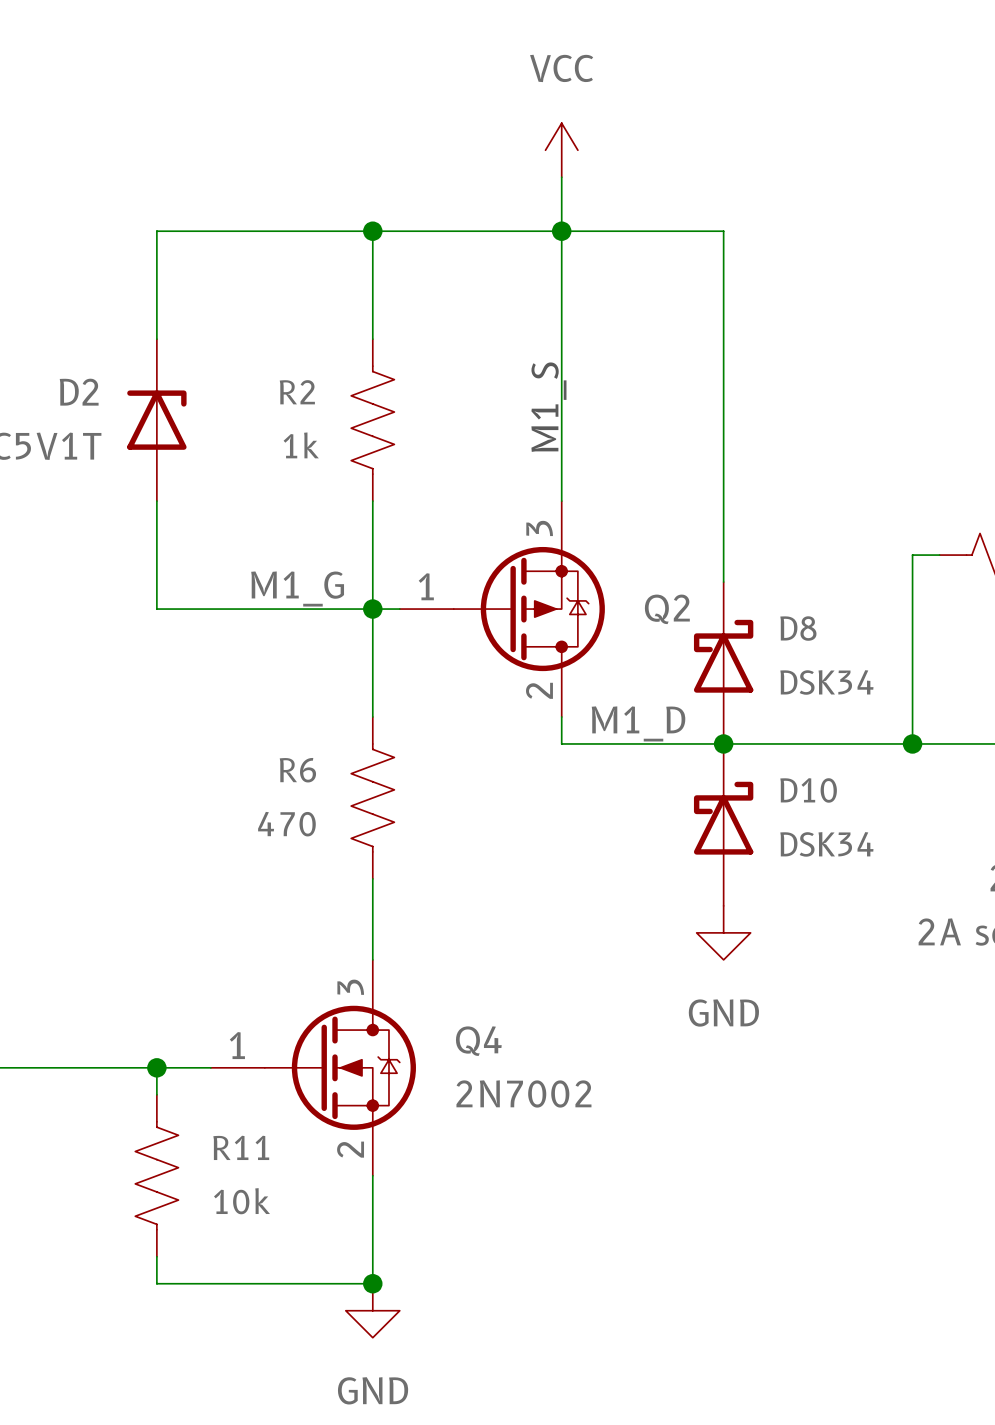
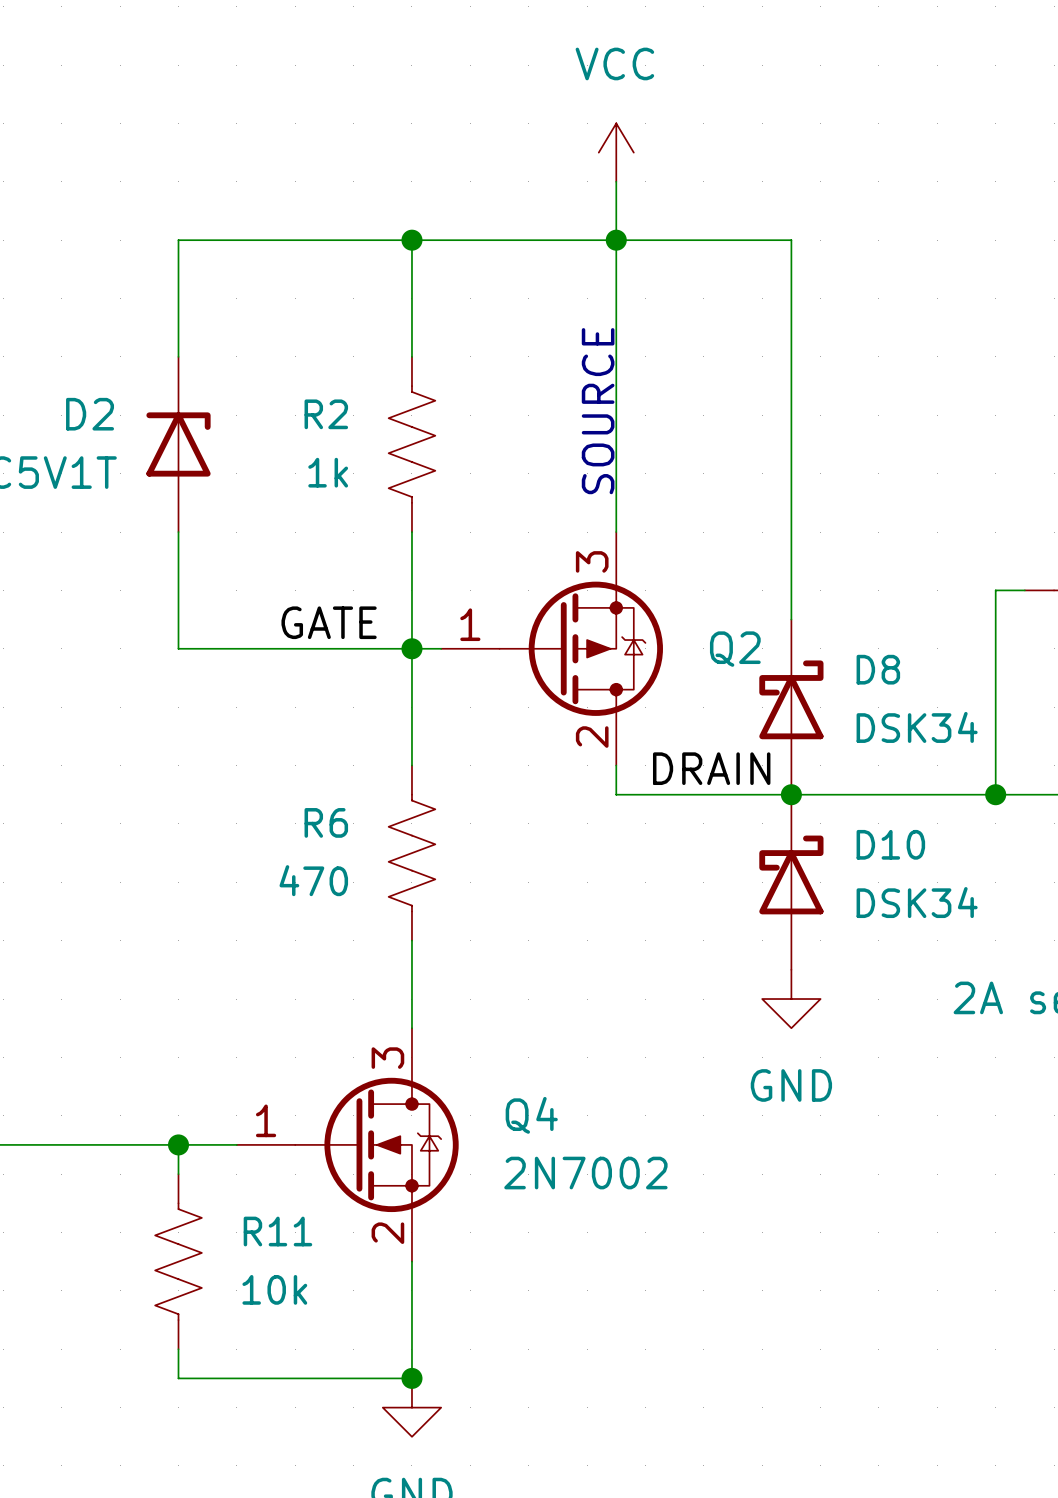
text: none -> SOURCE (598, 411)
text: M1_S (548, 407) -> none
label: M1_G (297, 588) -> GATE (329, 622)
label: M1_D (638, 723) -> DRAIN (711, 768)

